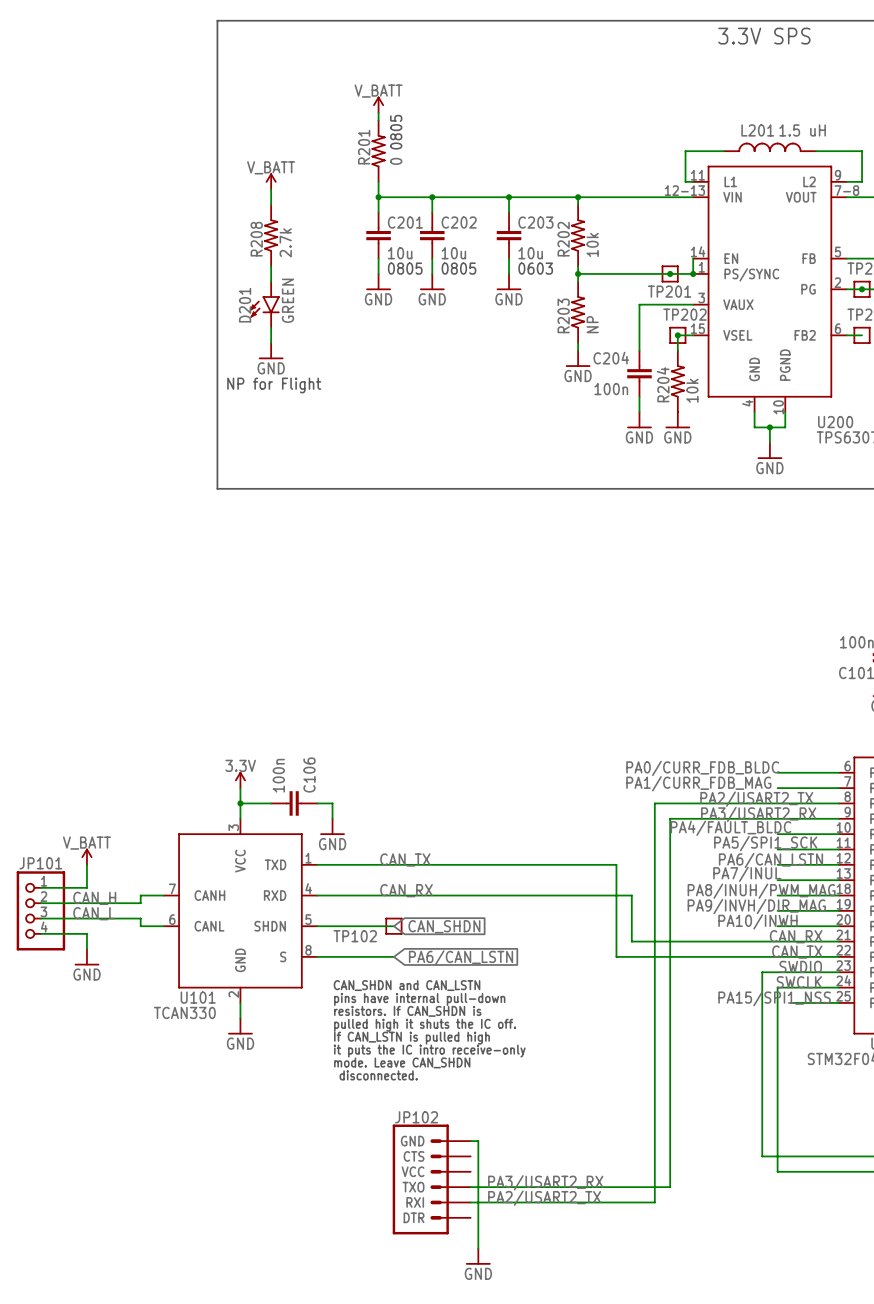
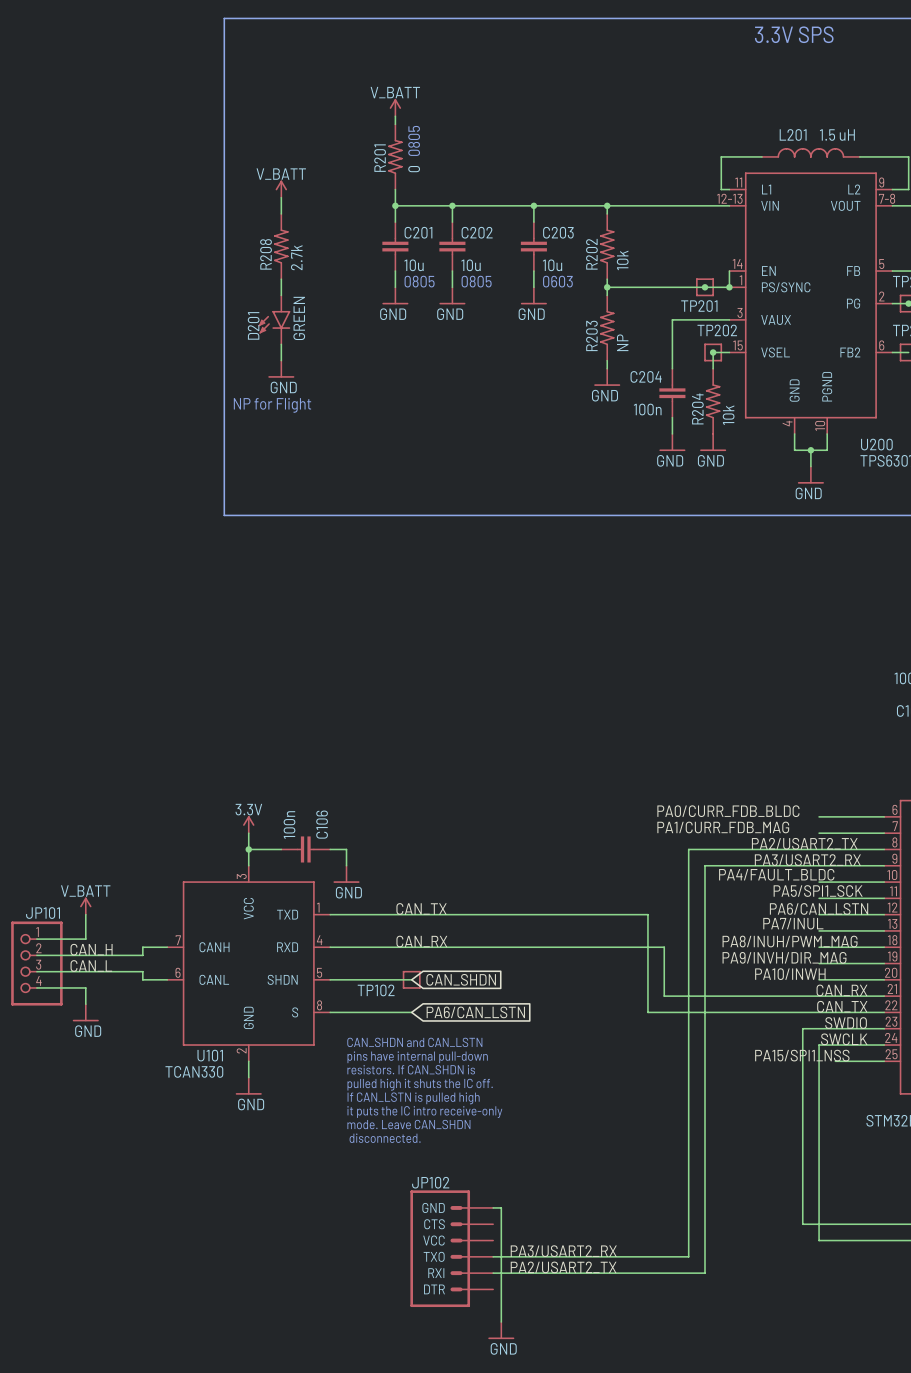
wire: (670, 1187) (654, 1187) (654, 1202) -> (704, 1256) (704, 1273) (688, 1273)

